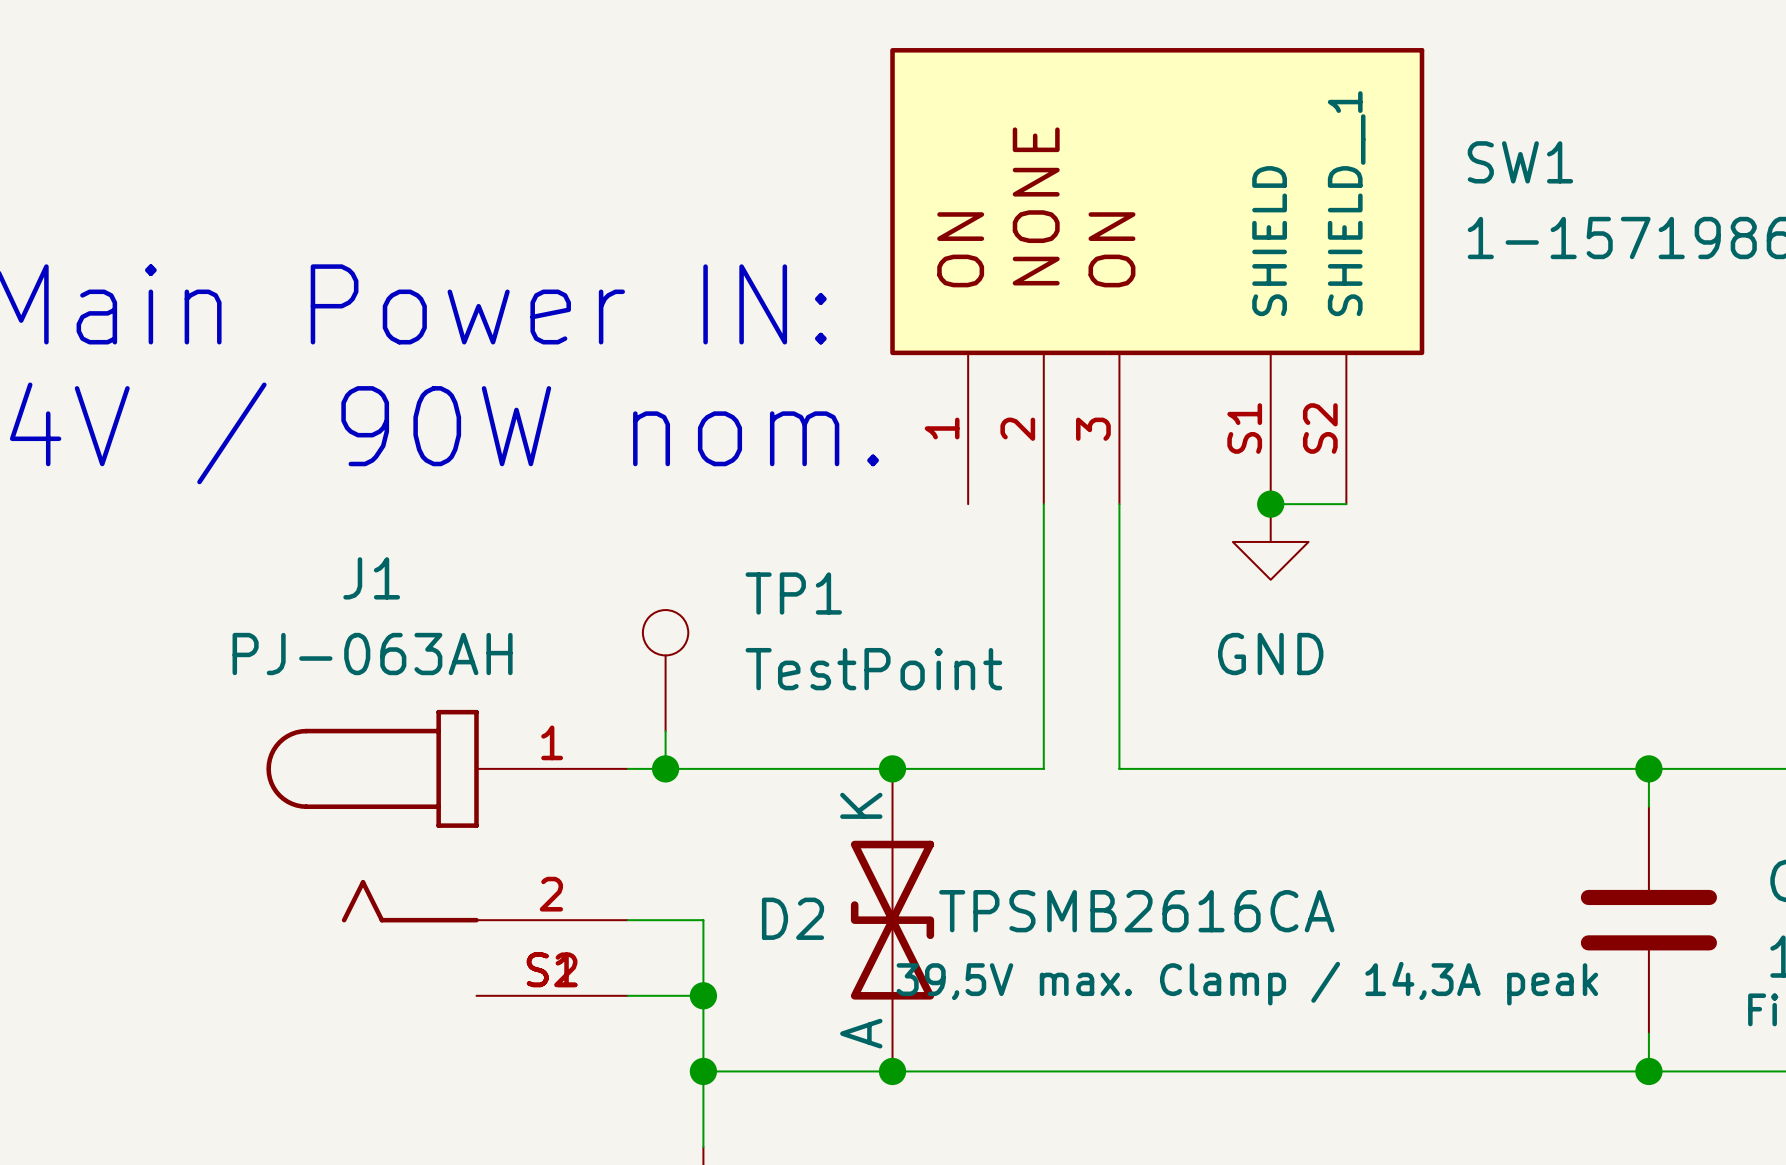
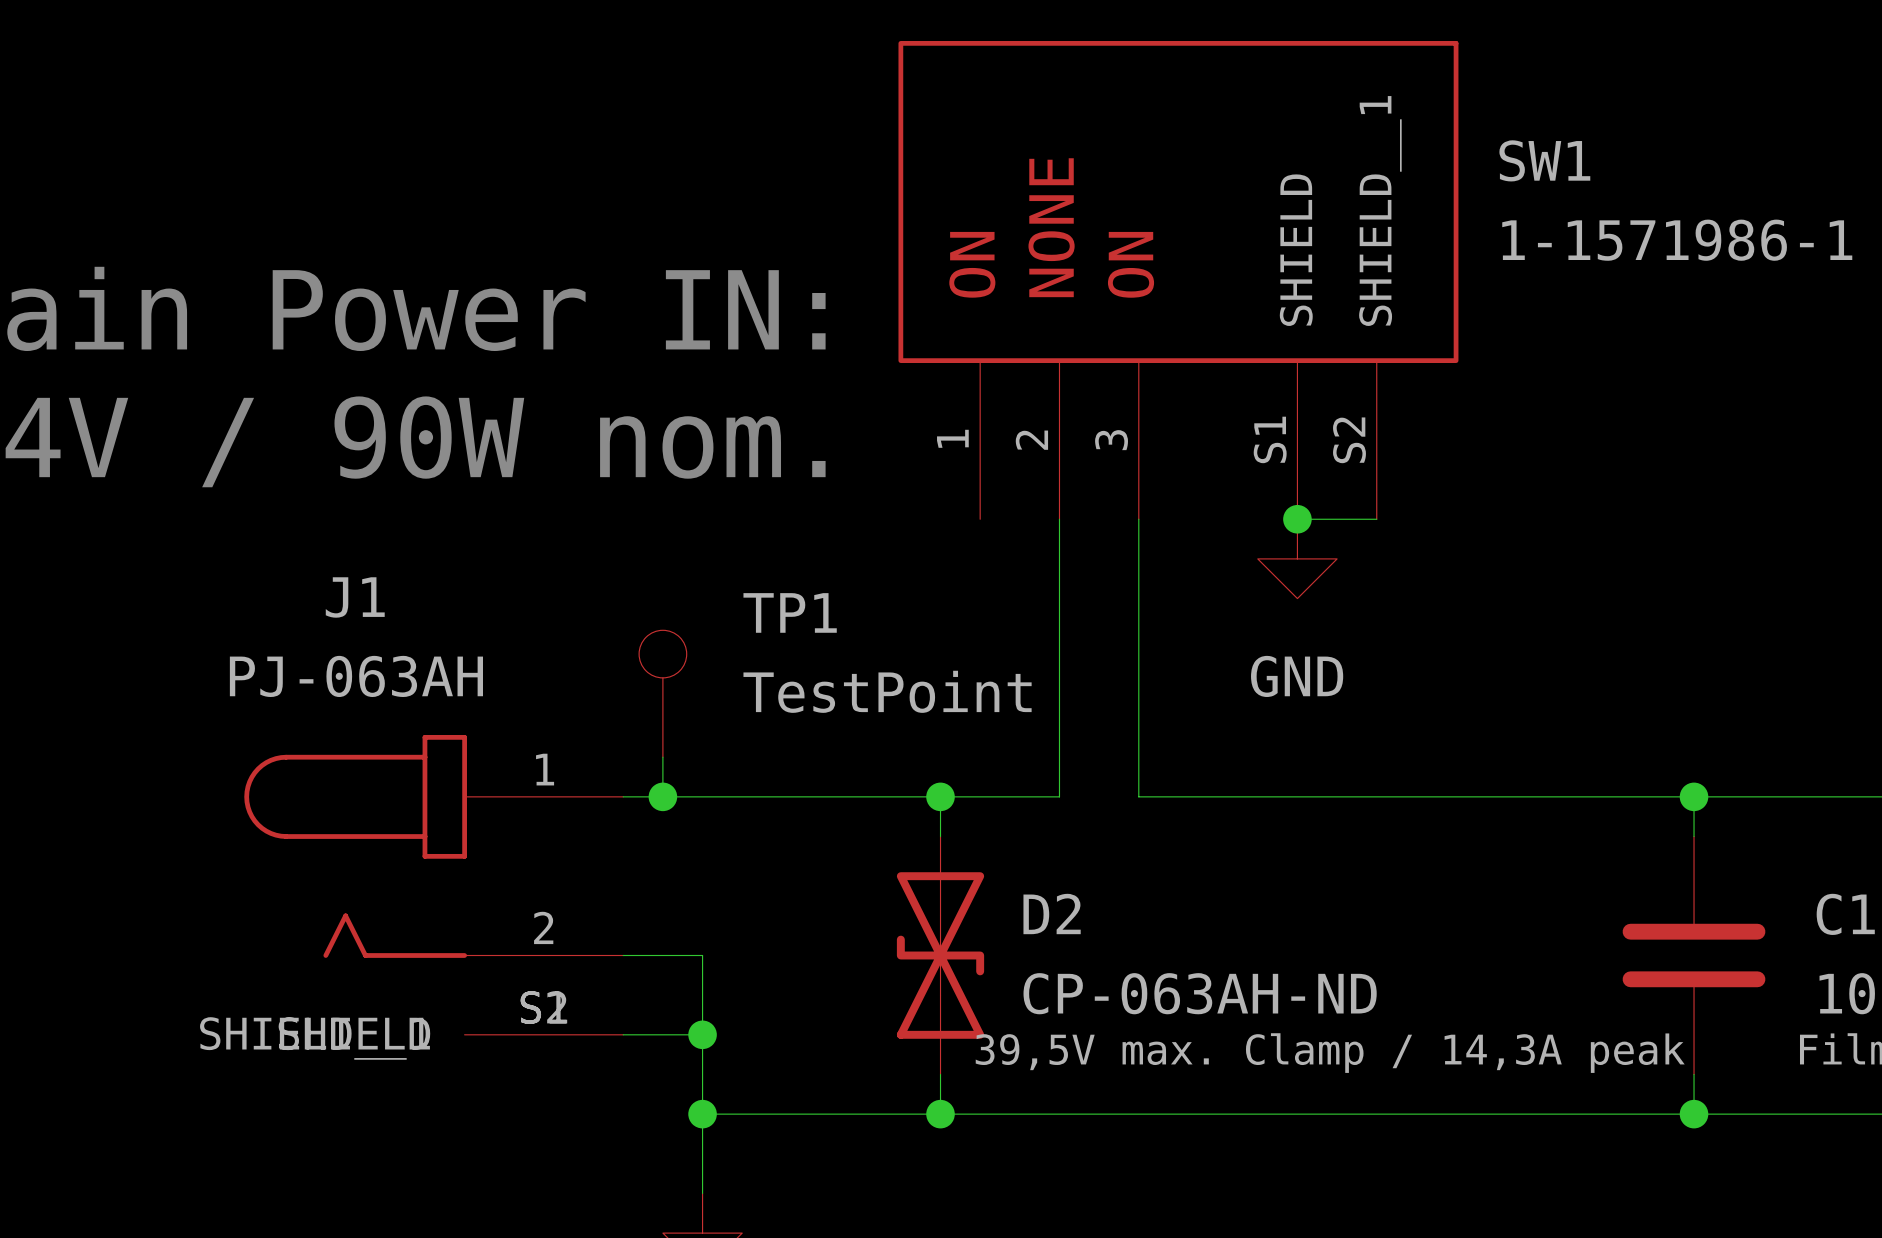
J1 symbol: [266, 709, 628, 996] -> [244, 735, 624, 1035]
D2 symbol: [850, 768, 935, 1072] -> [896, 836, 985, 1075]
junction position: (892, 768) -> (940, 796)
wire: none -> (940, 796) (940, 836)
D2 value: TPSMB2616CA (1136, 911) -> CP-063AH-ND (1200, 993)
D2 name position: D2 (792, 918) -> D2 (1052, 914)
wire: none -> (940, 1074) (940, 1114)
junction position: (892, 1071) -> (940, 1114)

